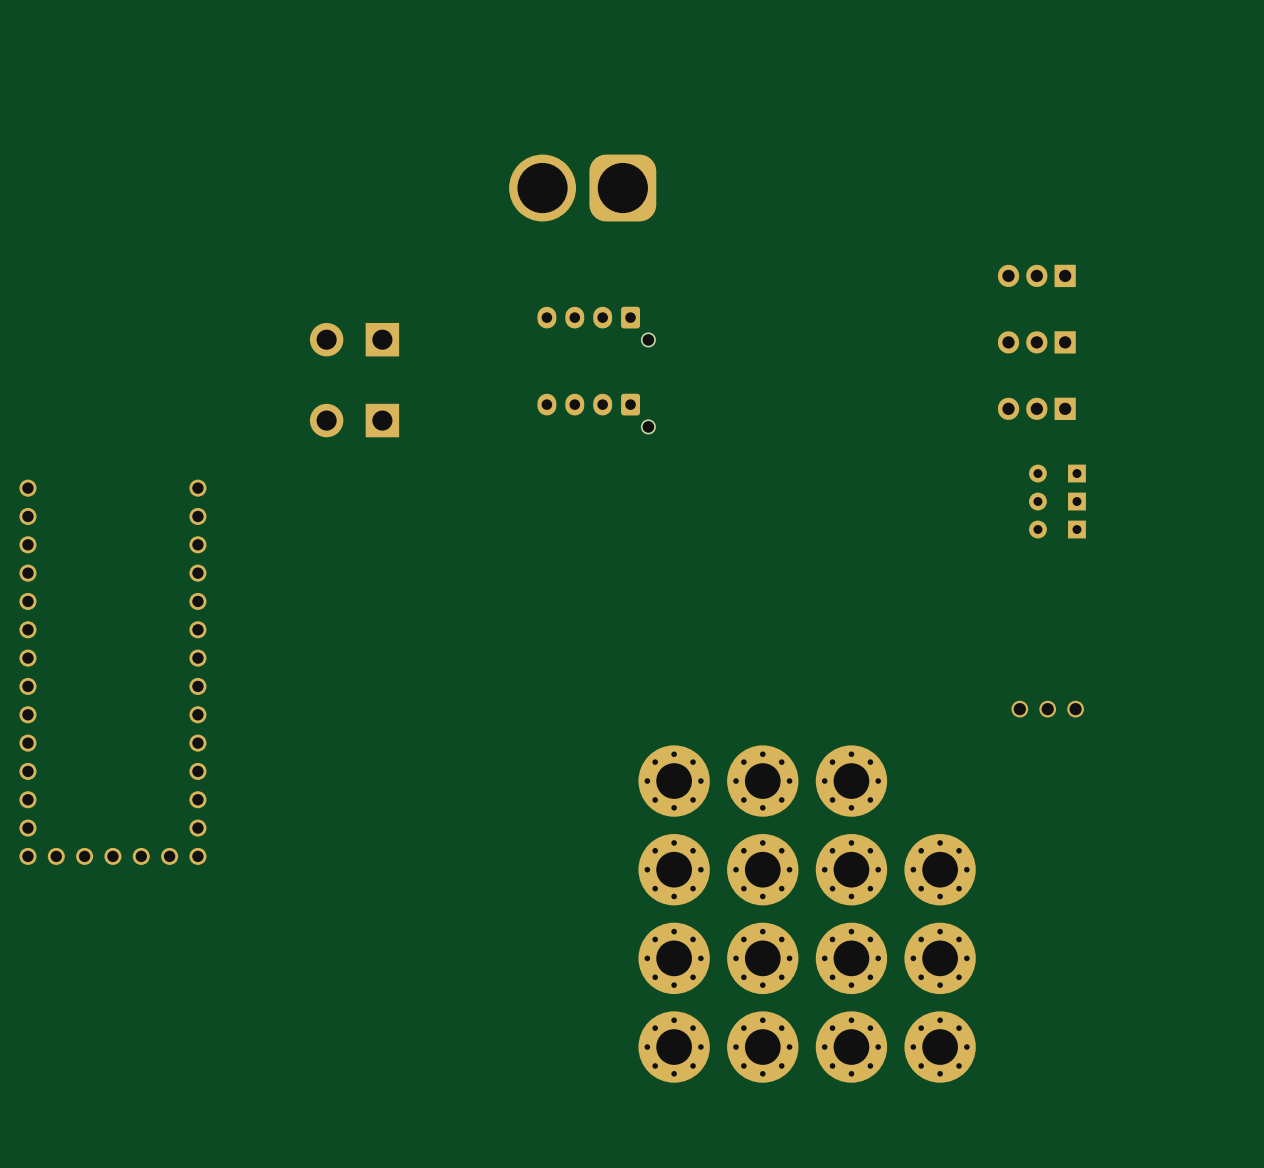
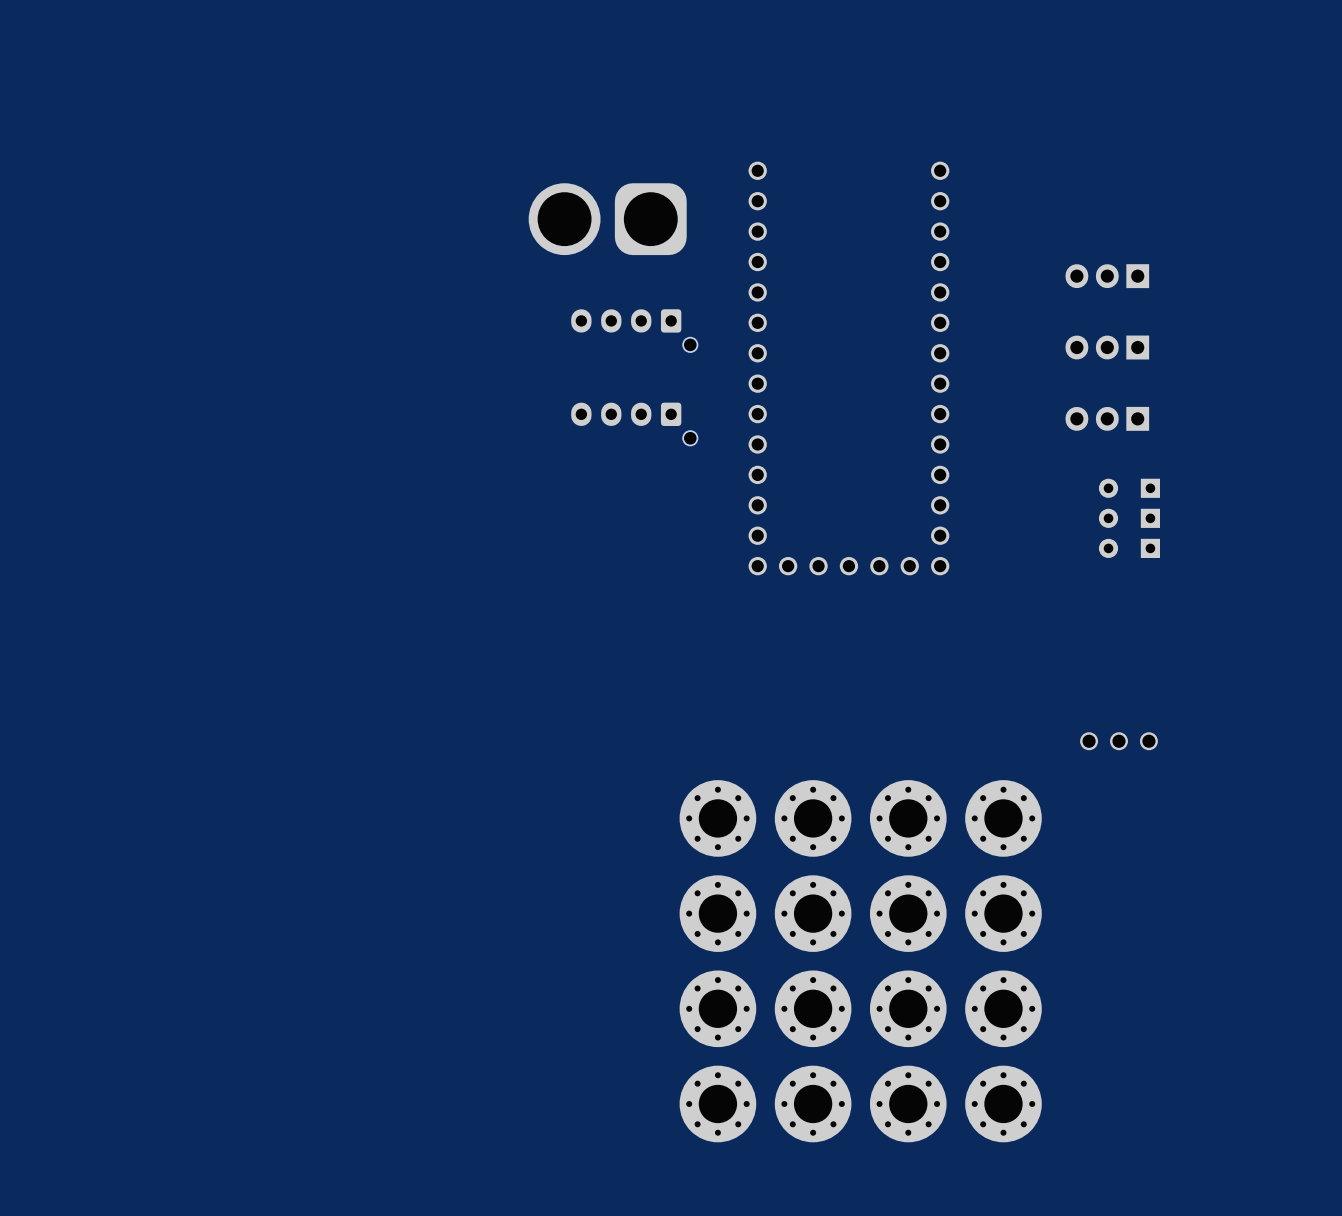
part position: (582, 188) -> (607, 219)
part: (354, 339) -> none
part: none -> (848, 368)
part: (354, 420) -> none
part: (112, 672) -> none
part: none -> (1003, 818)

